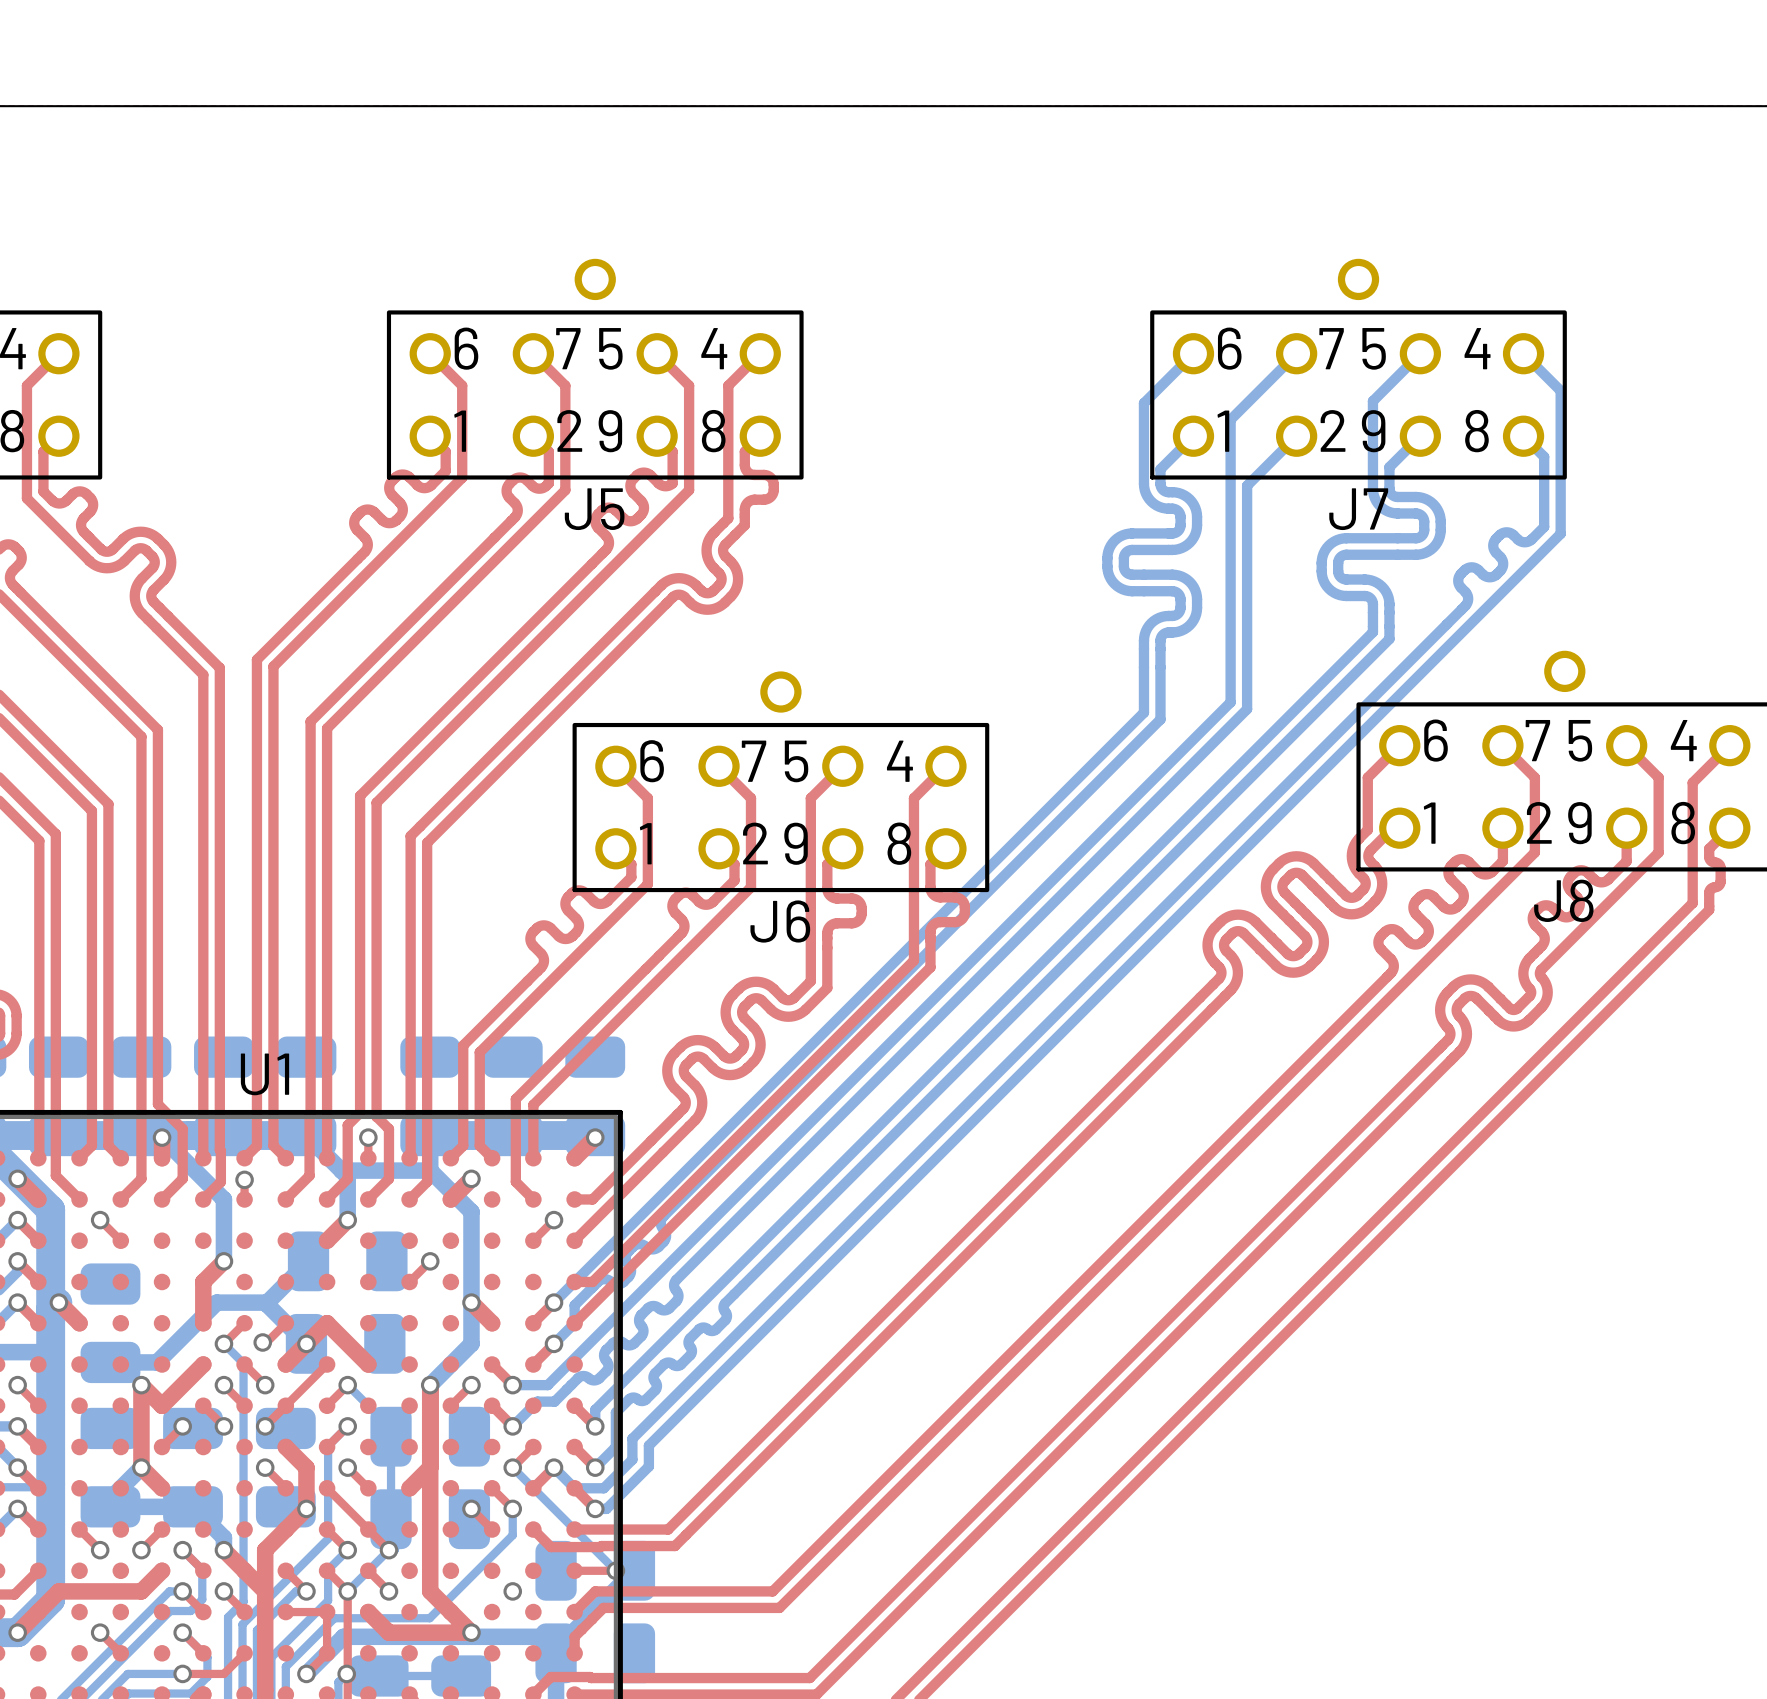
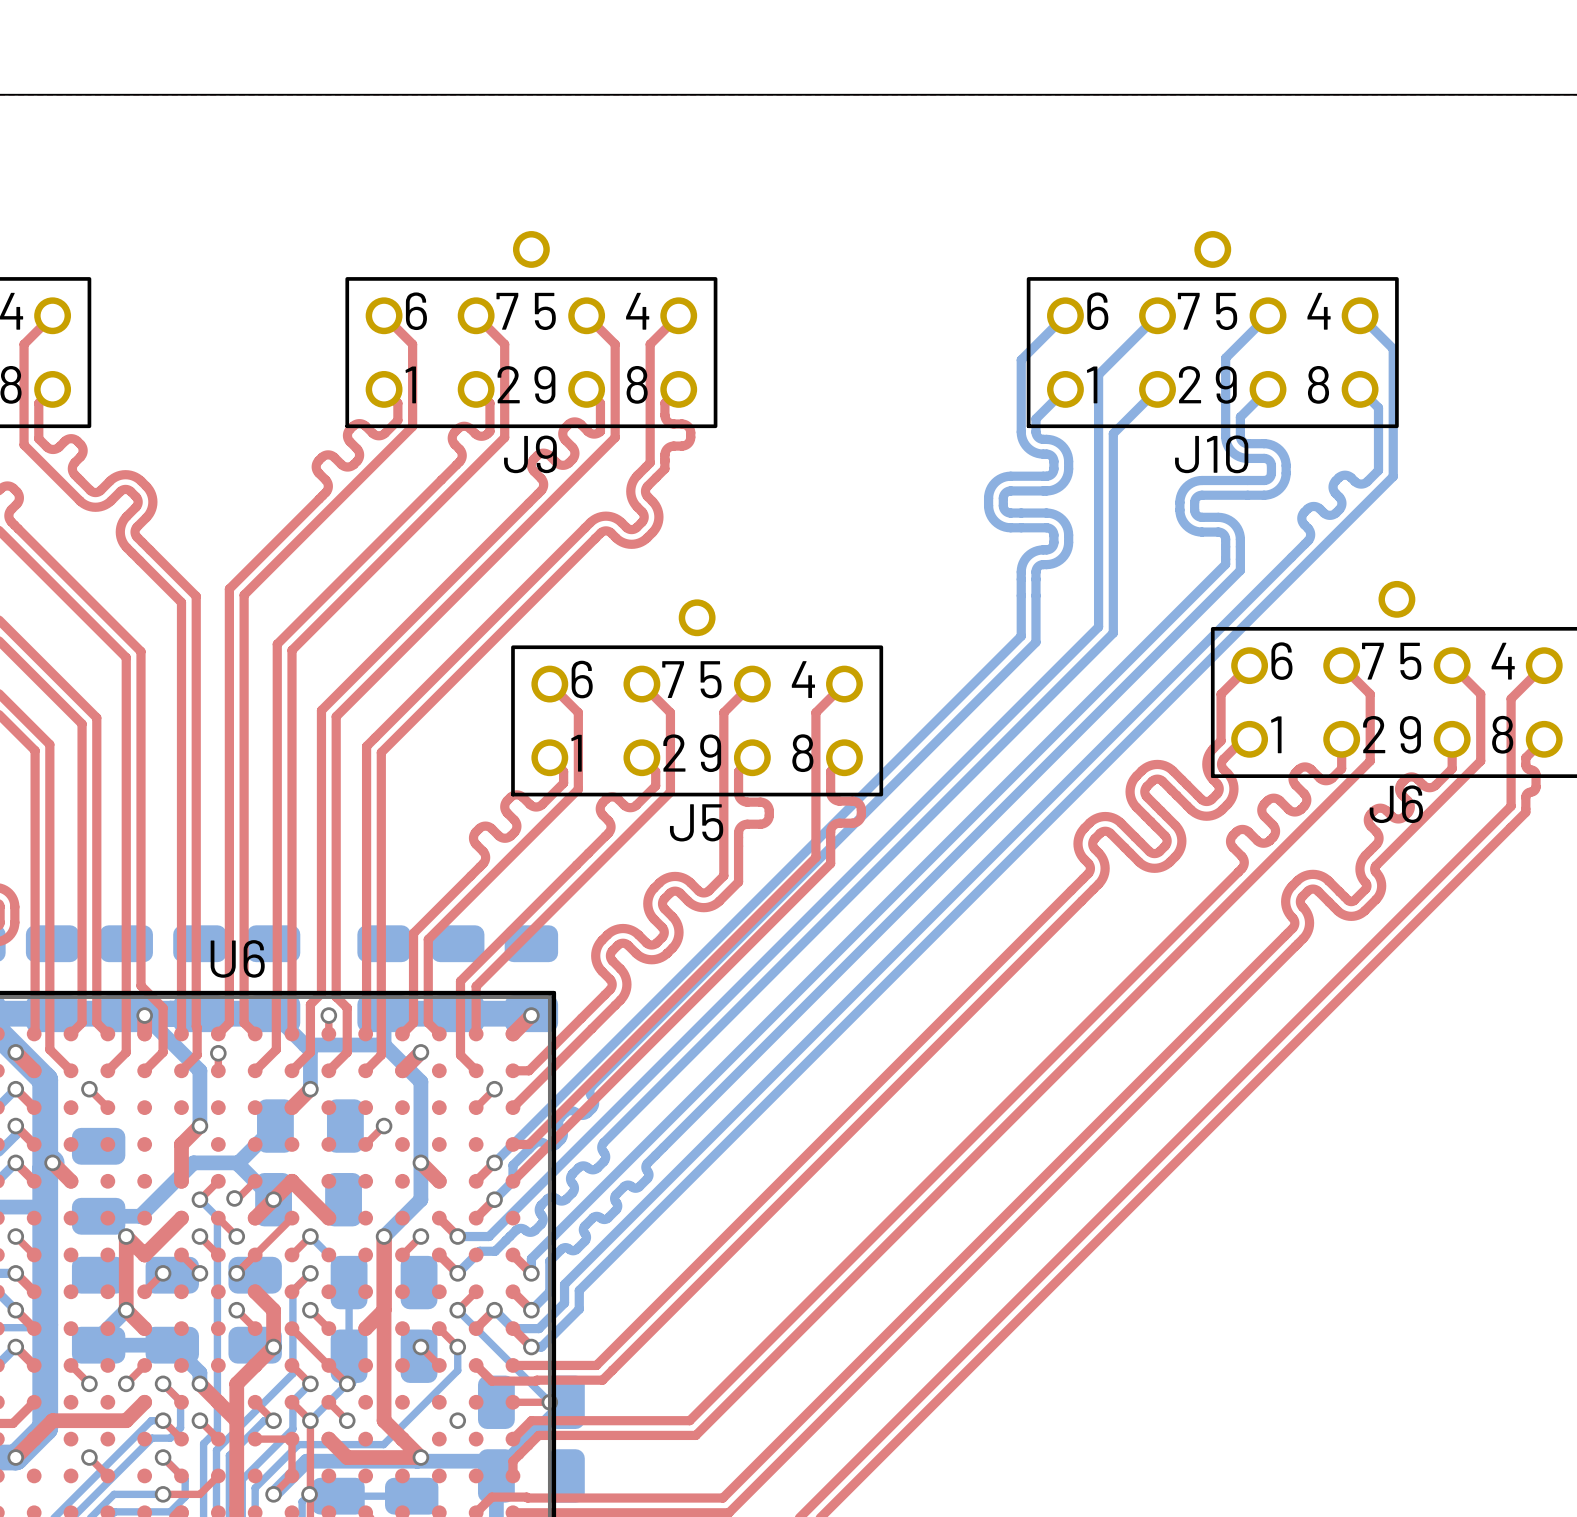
J5 name: J5 (594, 509) -> J9 (530, 454)
J7 name: J7 (1358, 509) -> J10 (1211, 454)
J8 name: J8 (1563, 900) -> J6 (1396, 804)
J6 name: J6 (780, 921) -> J5 (696, 822)
U1 name: U1 (264, 1074) -> U6 (237, 958)

